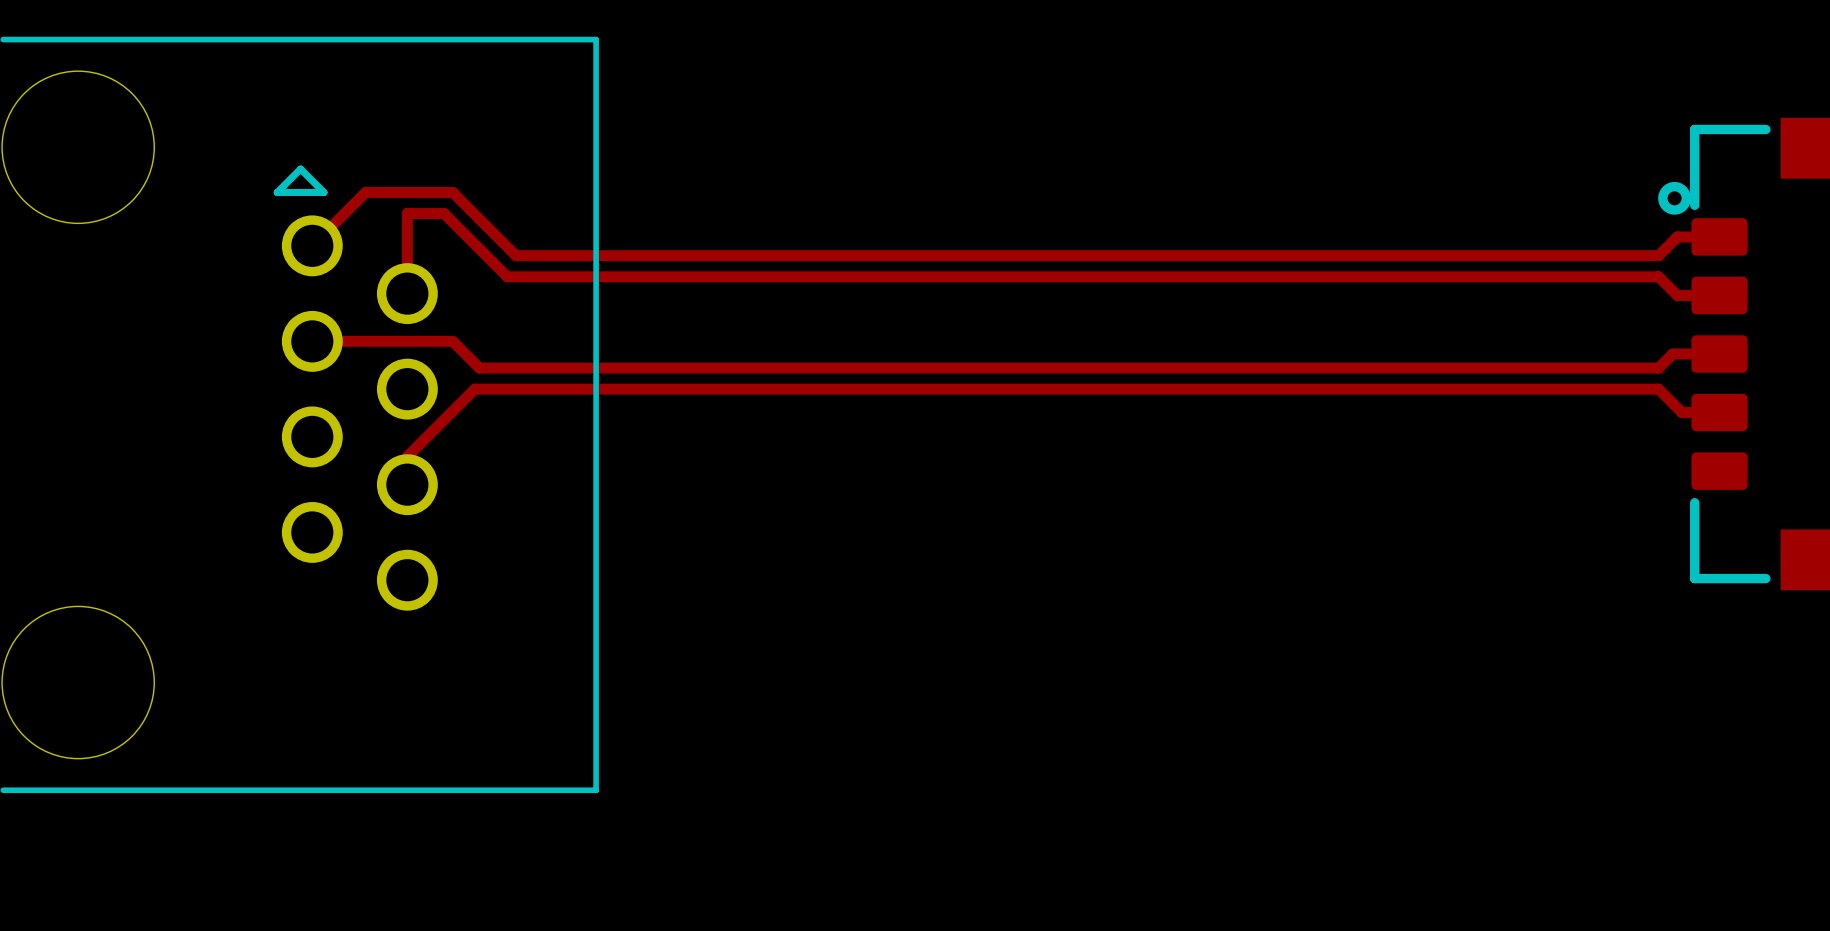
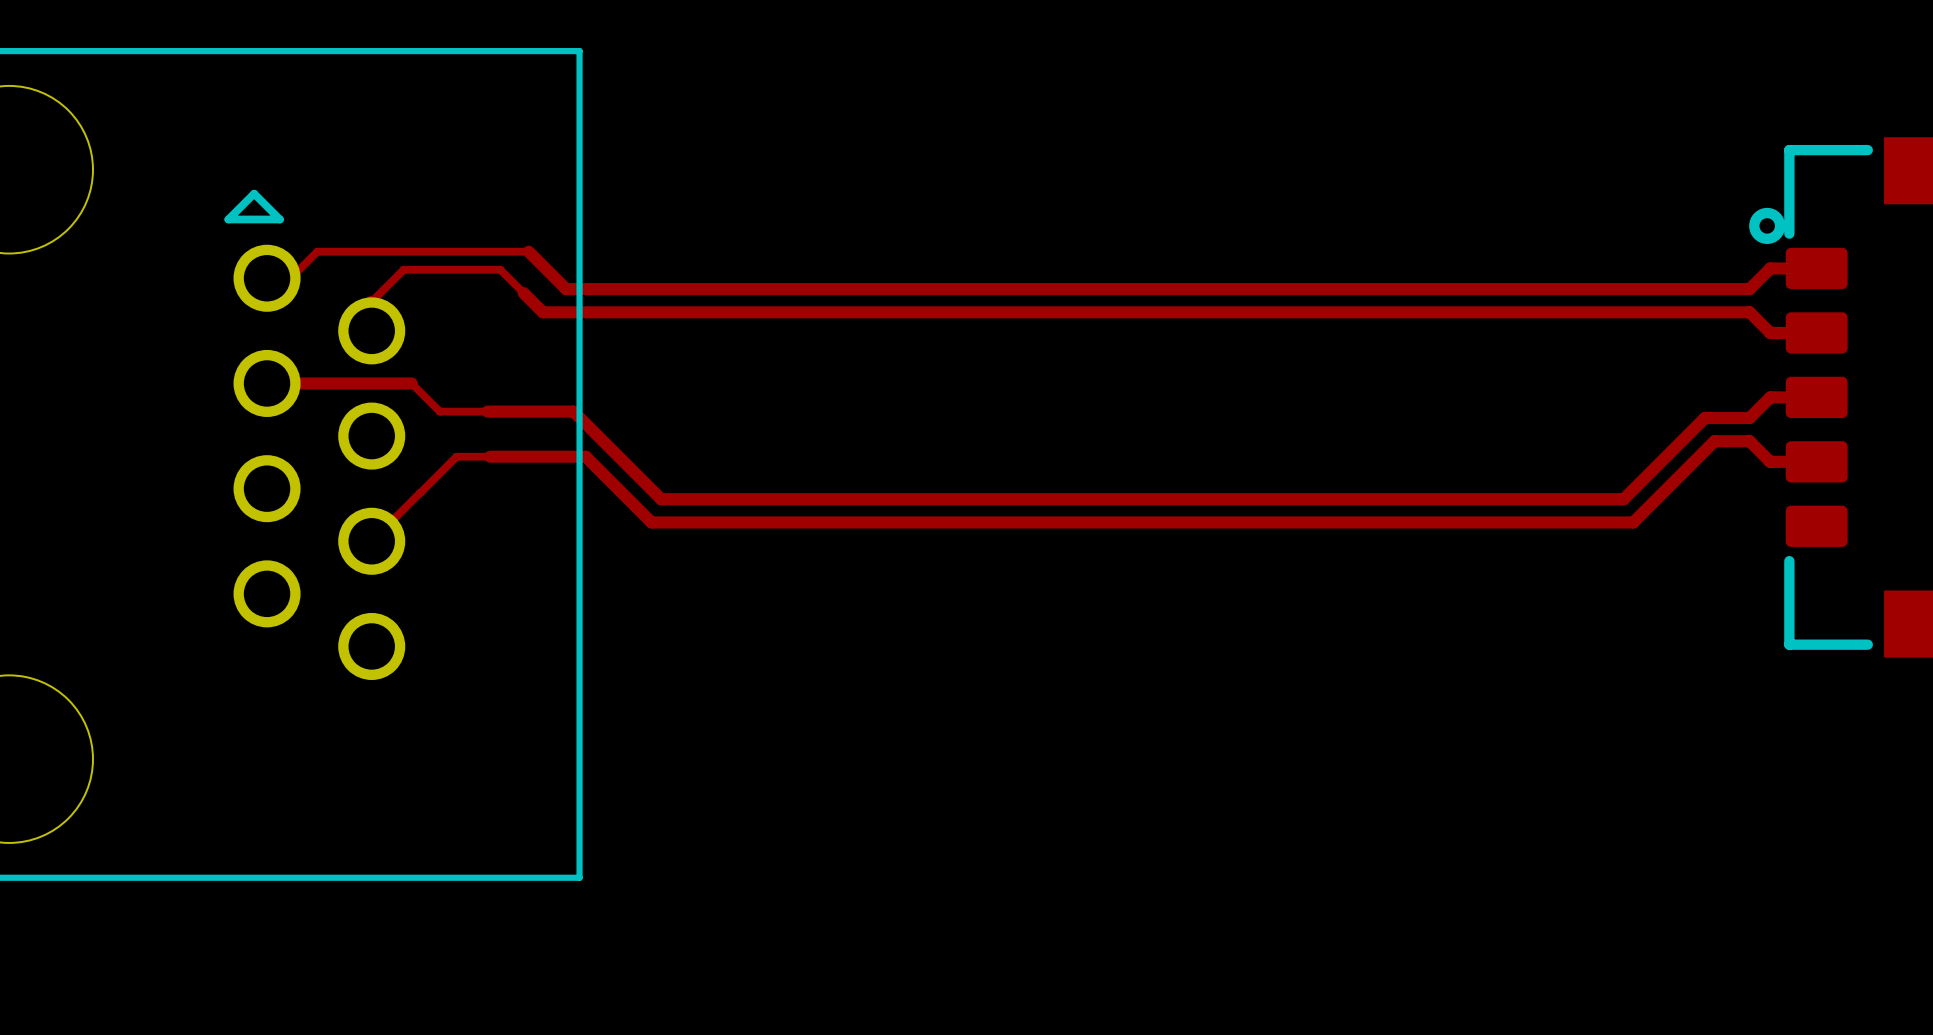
track: (312, 245) (365, 192) (452, 192) (516, 255) (583, 255) -> (267, 278) (290, 278) (317, 251) (528, 251) (566, 289)
track: (407, 267) (407, 213) (444, 213) (507, 276) (562, 276) -> (371, 301) (403, 269) (500, 269) (542, 312)
track: (443, 341) (452, 341) (479, 368) (1658, 368) (1672, 354) (1677, 354) -> (411, 383) (439, 411) (573, 411) (661, 499) (1623, 499) (1704, 418) (1749, 418) (1770, 397)
track: (1682, 412) (1658, 389) (474, 389) (407, 456) (407, 484) -> (1775, 461) (1770, 461) (1749, 441) (1714, 441) (1633, 522) (651, 522) (585, 456) (456, 456) (420, 492)
track: none -> (420, 492) (371, 541)

